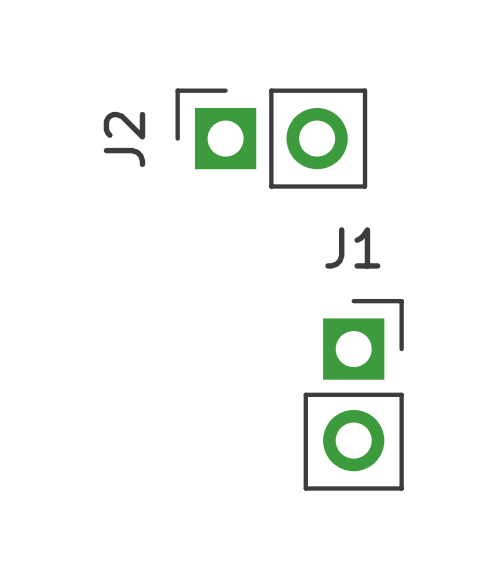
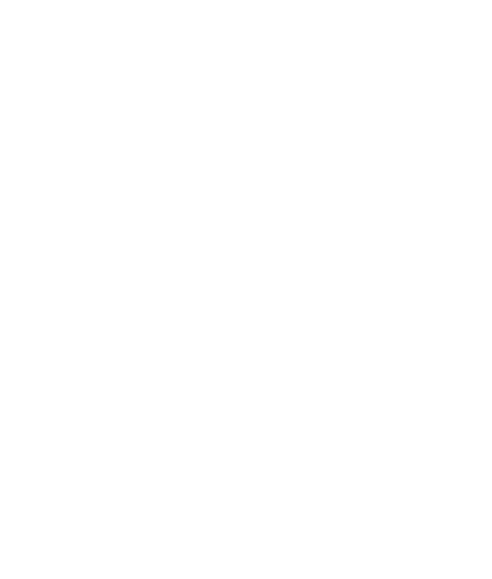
J2: (271, 138) -> none
J1: (353, 394) -> none

